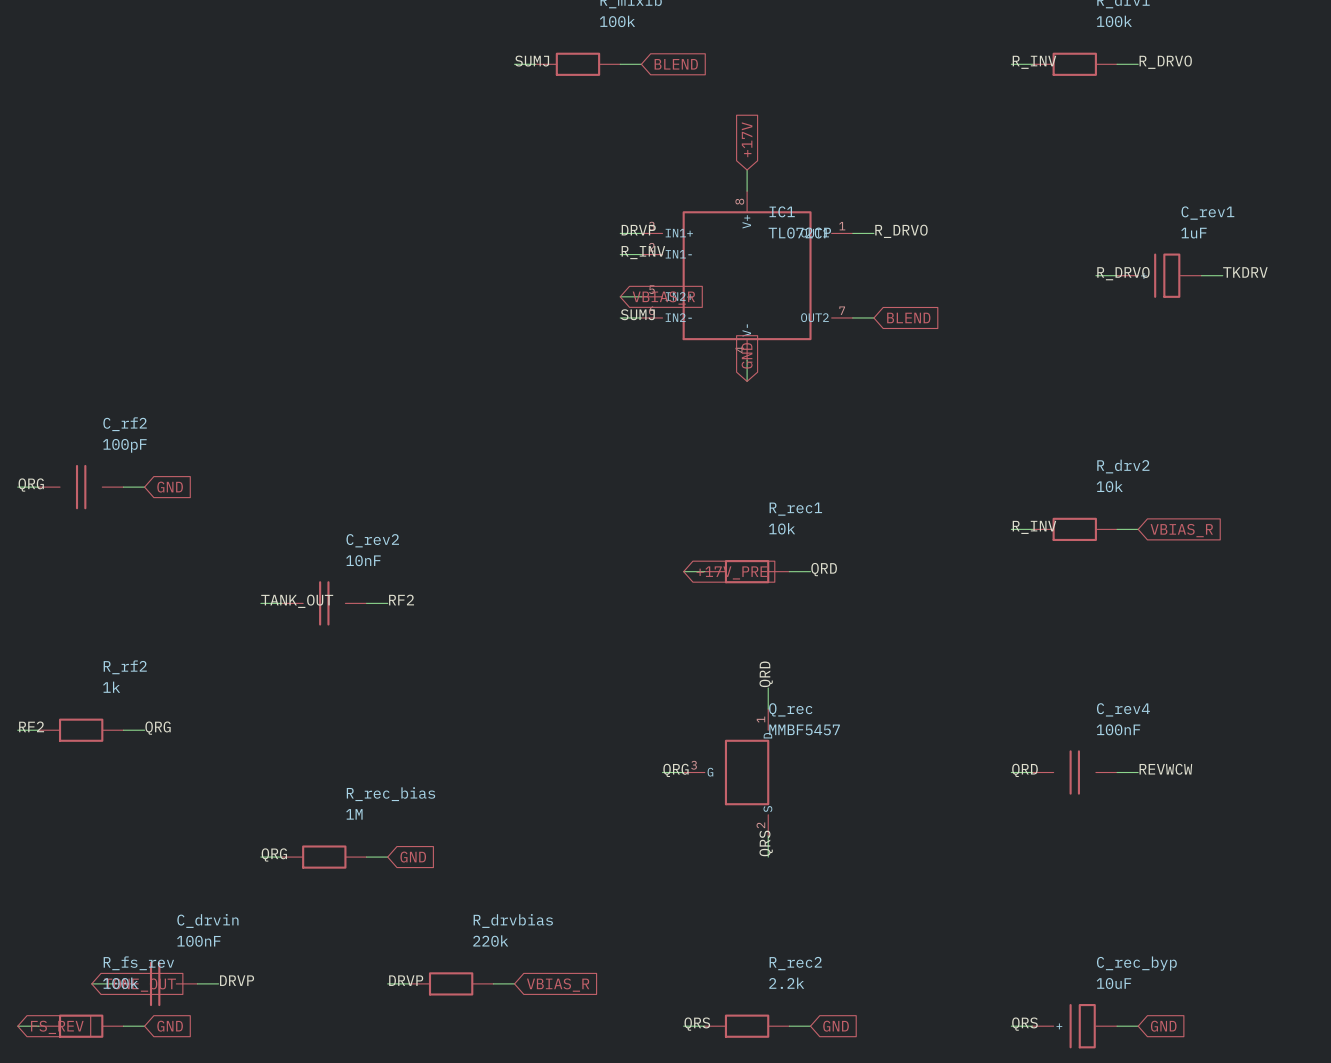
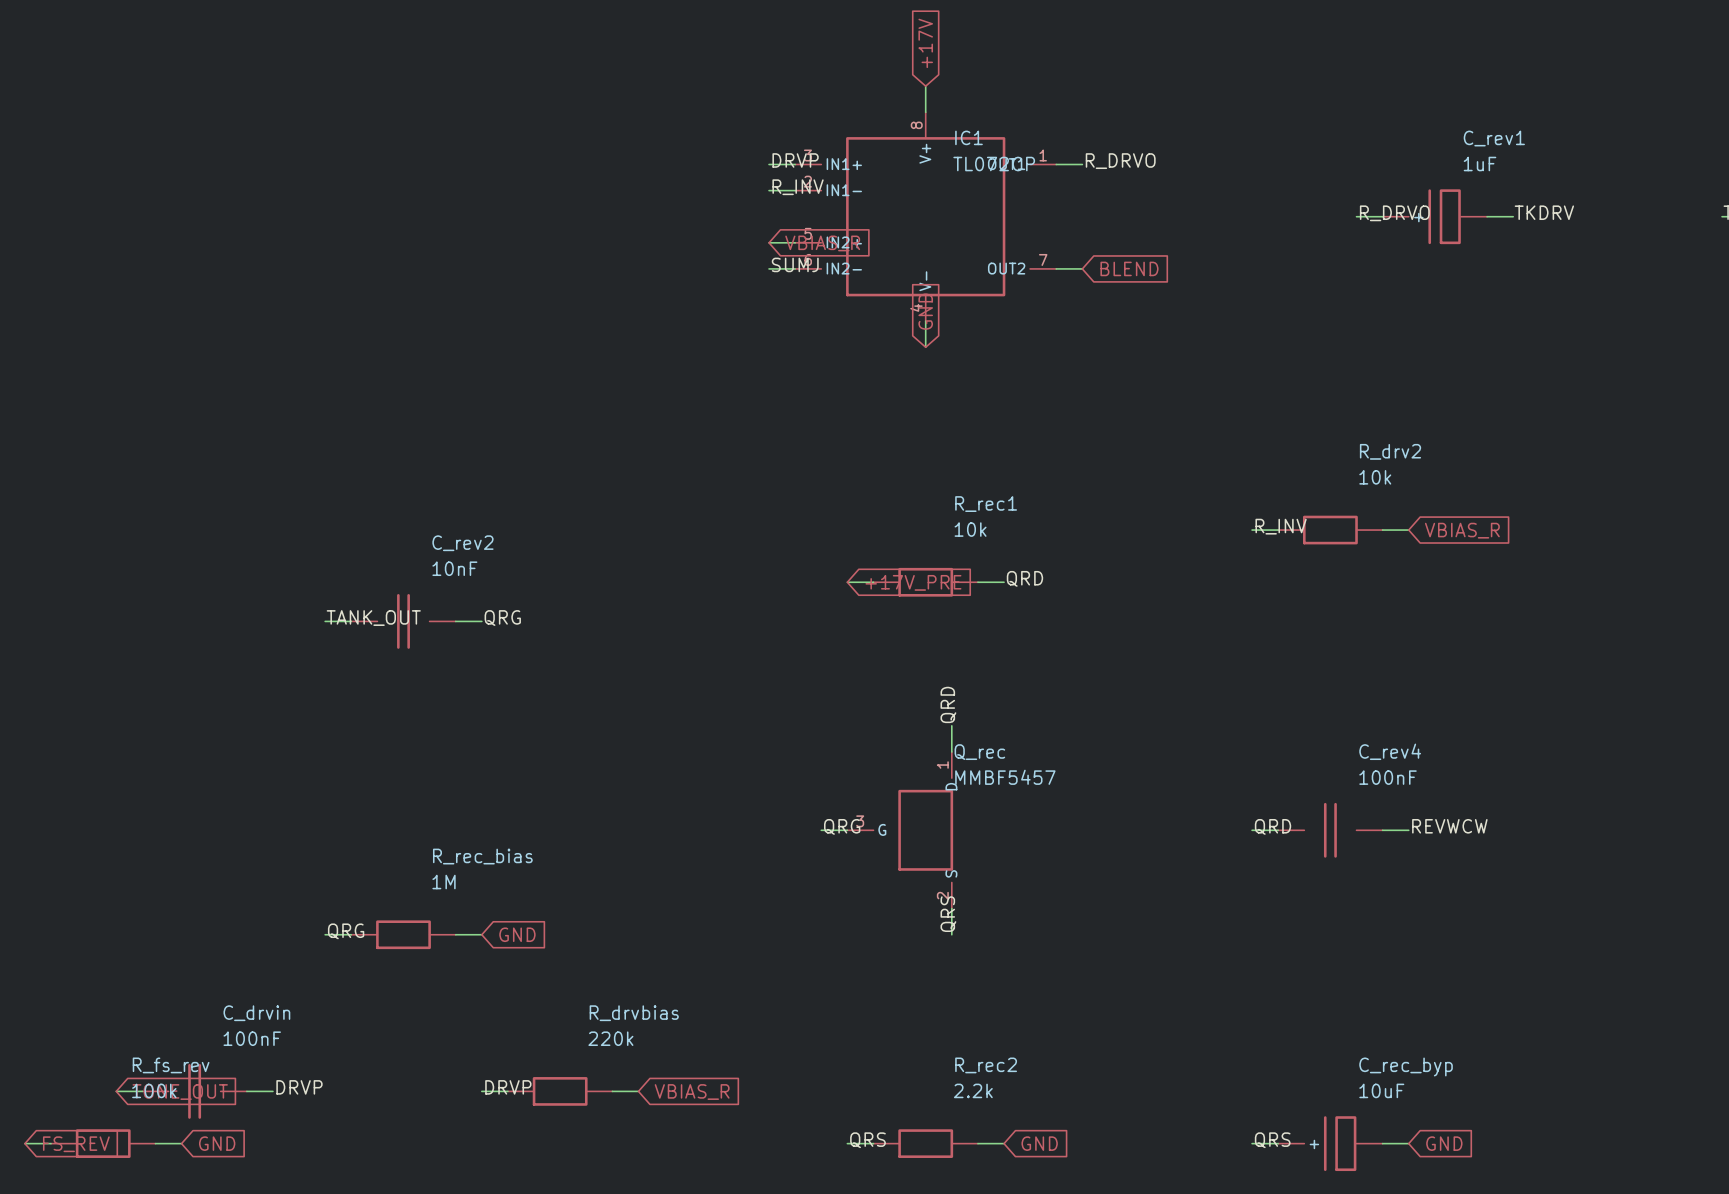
label: QRG (31, 485) -> none
wire: (17, 487) (38, 487) -> none
C_rf2: 100pF (81, 487) -> none
wire: (123, 487) (144, 487) -> none
global label: GND (170, 487) -> none
label: RF2 (401, 600) -> QRG (502, 618)
label: RF2 (31, 726) -> none
label: QRG (158, 728) -> none
wire: (17, 730) (38, 730) -> none
R_rf2: 1k (81, 730) -> none
wire: (123, 730) (144, 730) -> none

